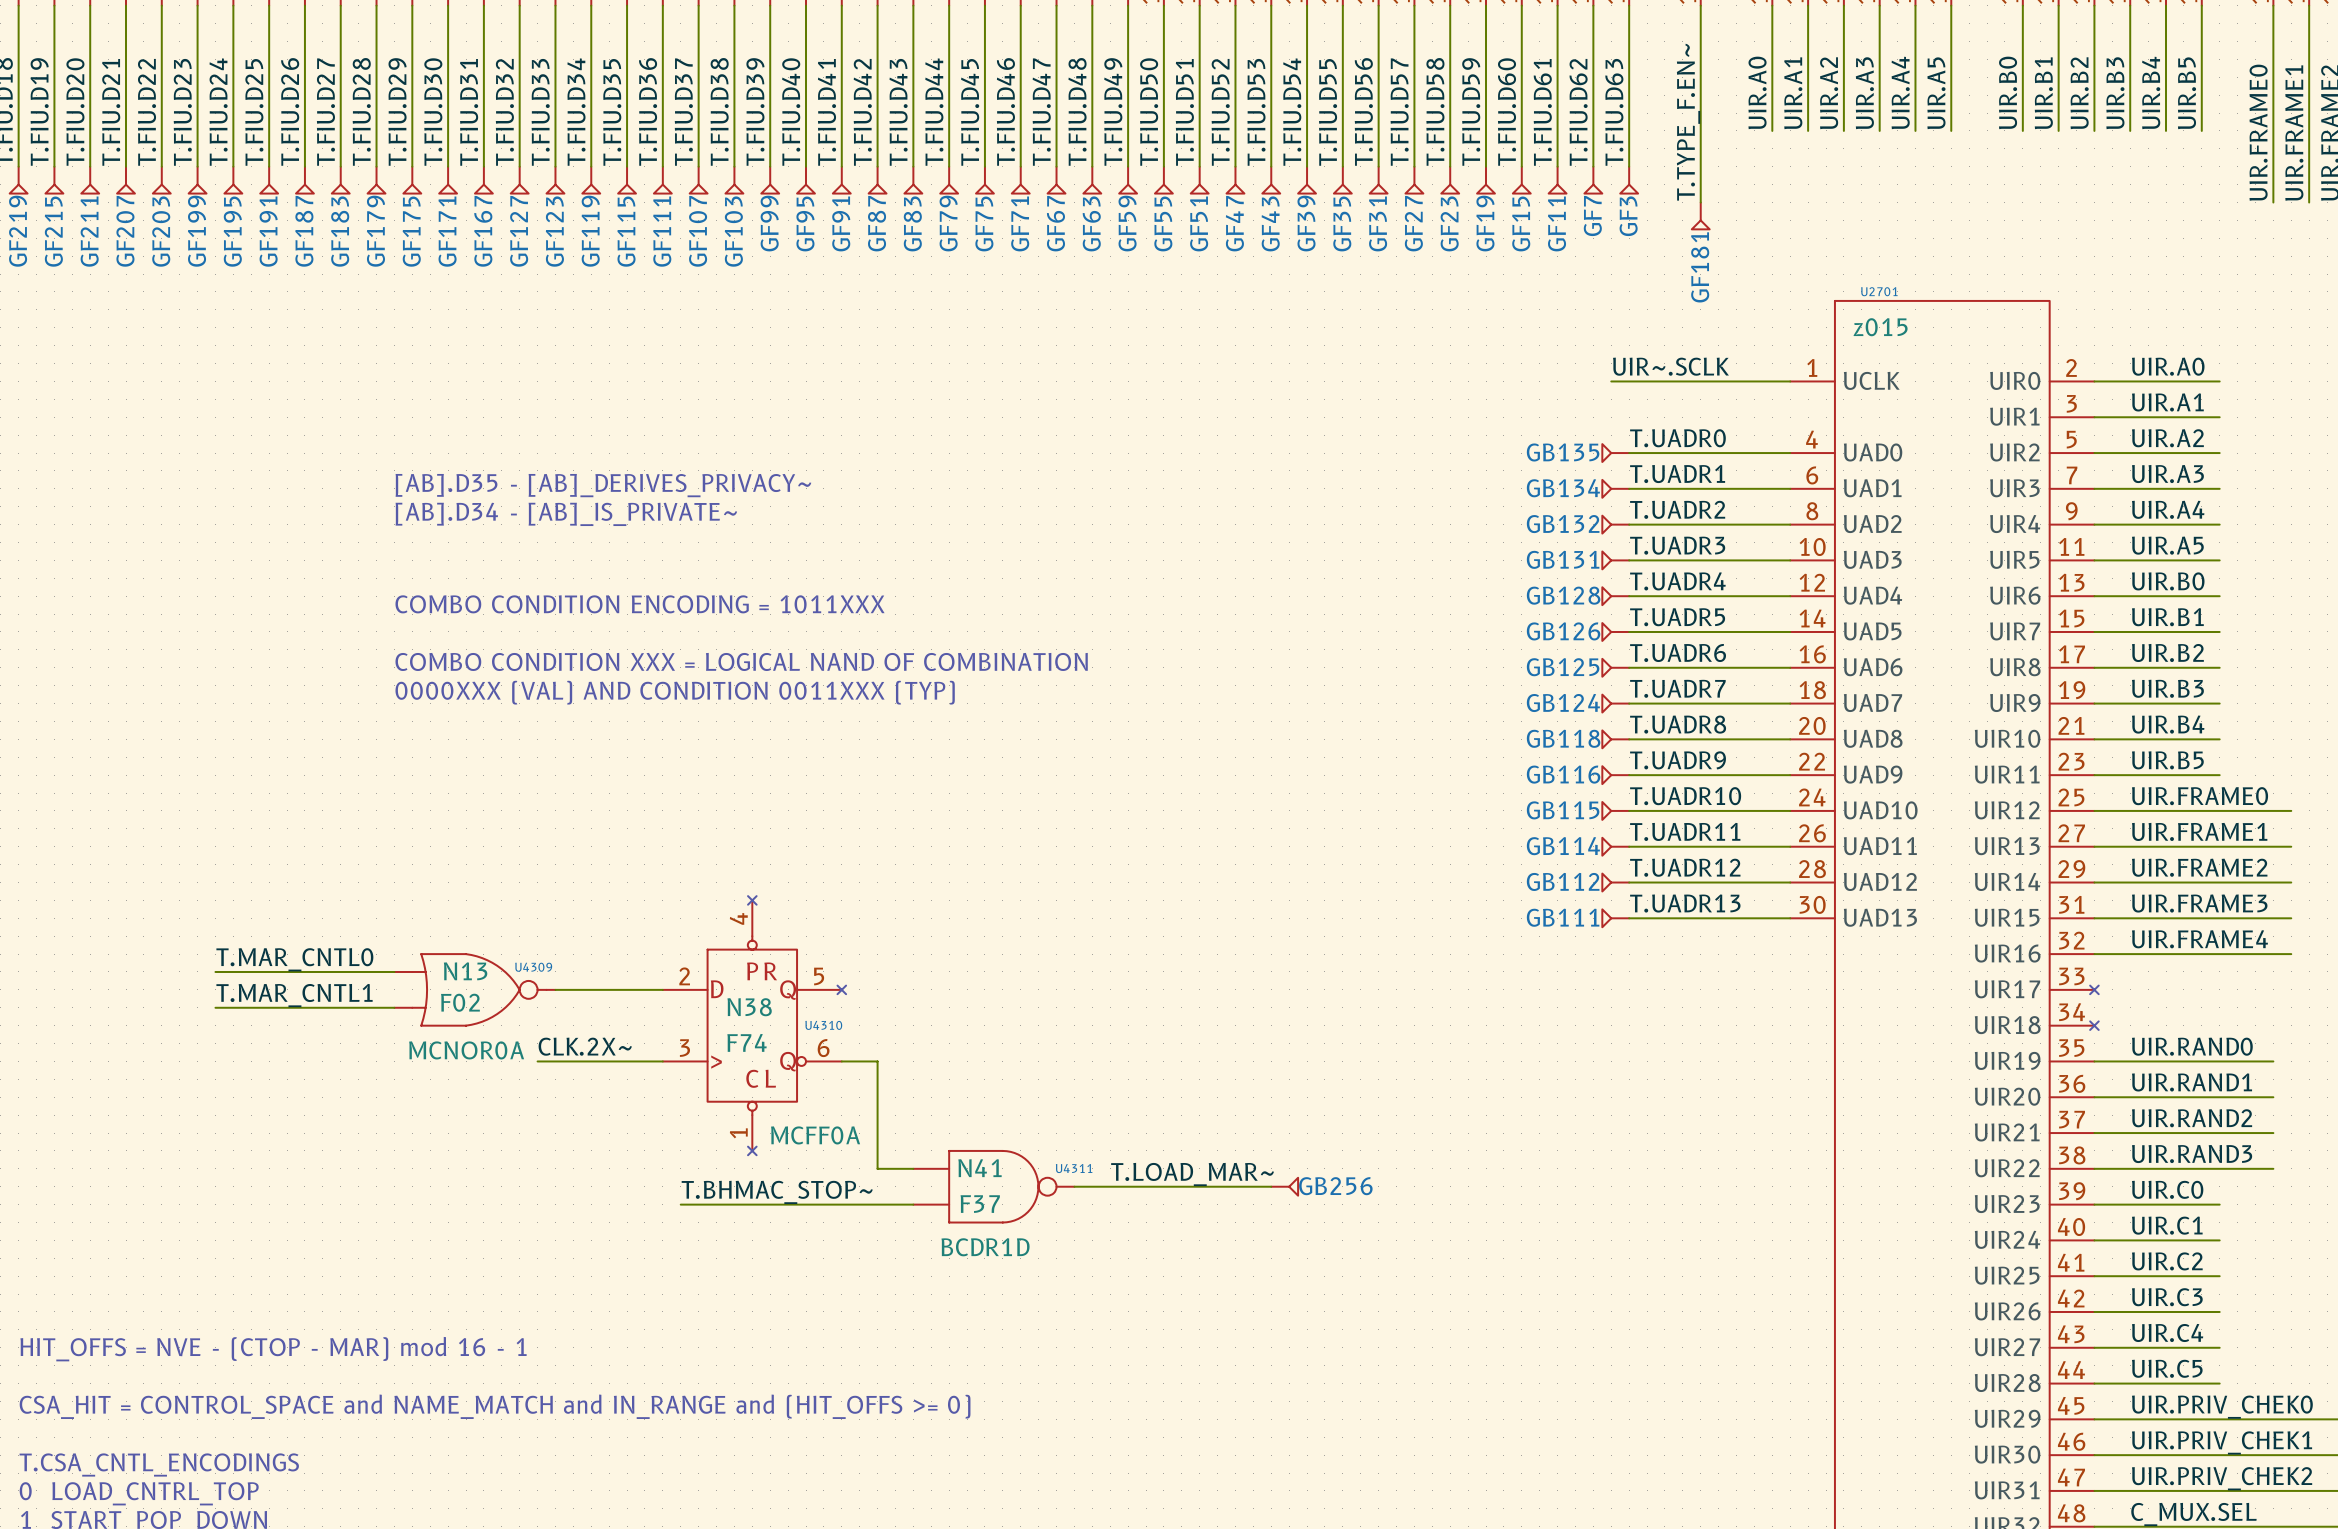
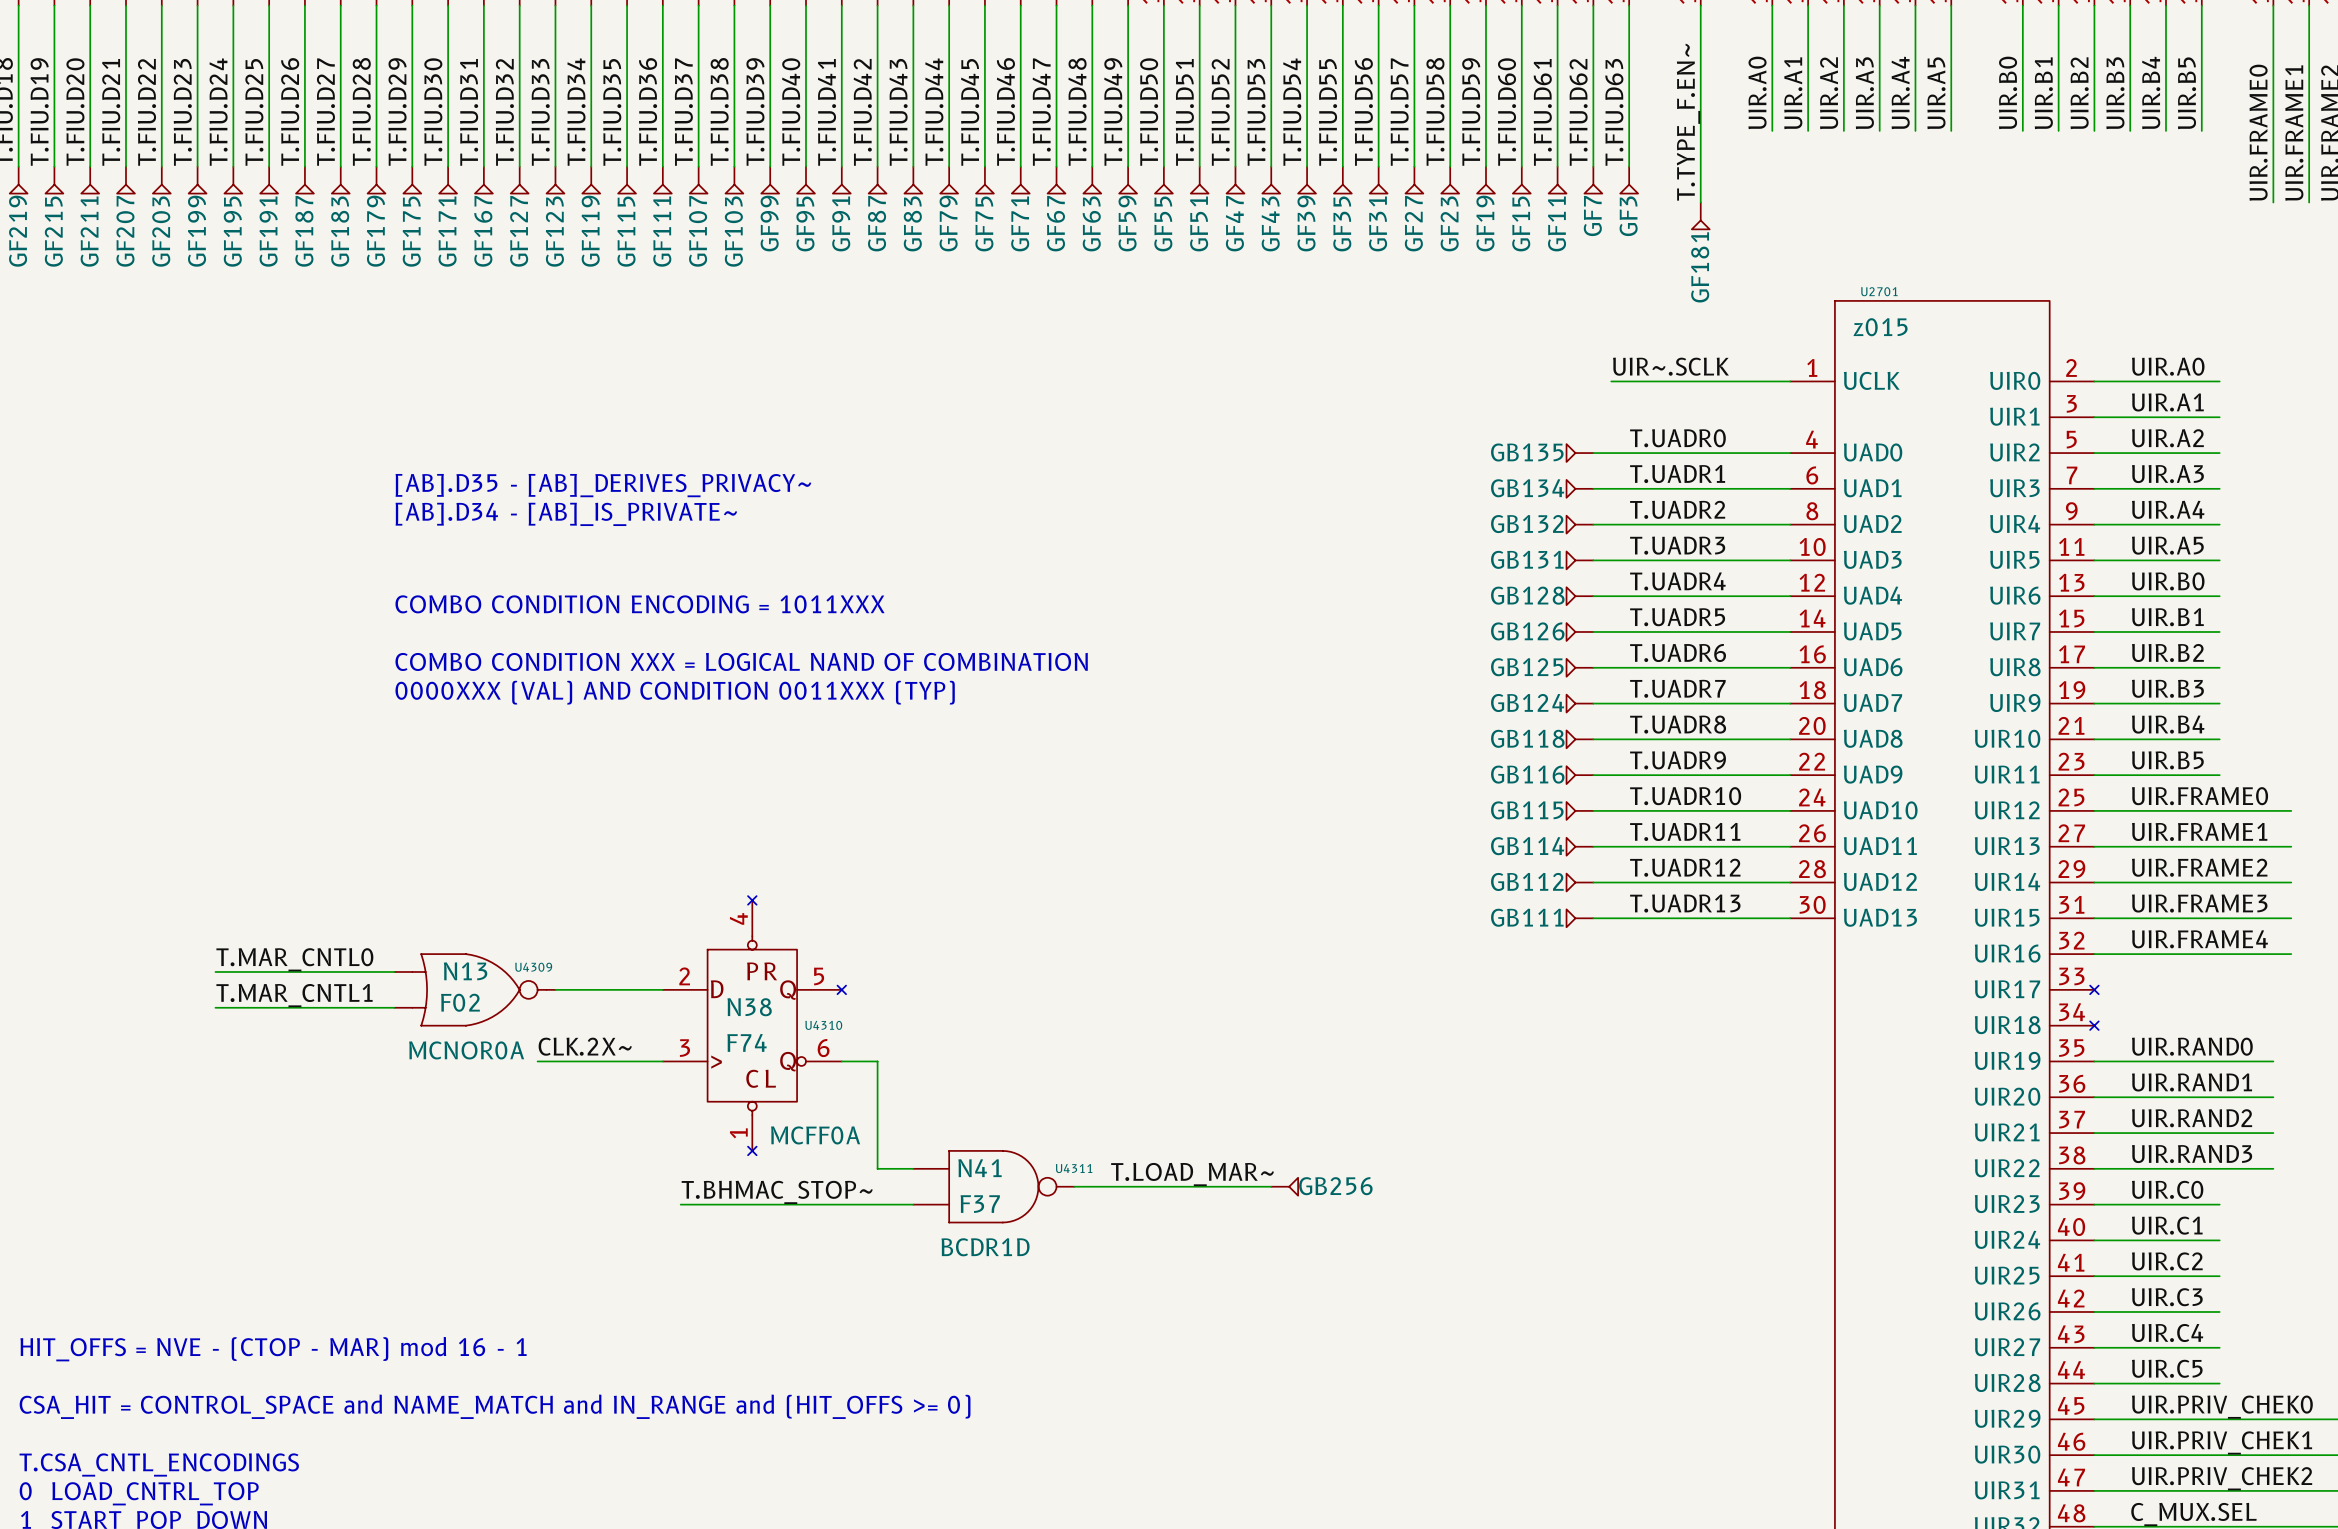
GB135 position: (1615, 453) -> (1579, 453)
GB134 position: (1615, 488) -> (1579, 488)
GB132 position: (1615, 524) -> (1579, 524)
GB131 position: (1615, 560) -> (1579, 560)
GB128 position: (1615, 596) -> (1579, 596)
GB126 position: (1615, 631) -> (1579, 631)
GB125 position: (1615, 667) -> (1579, 667)
GB124 position: (1615, 703) -> (1579, 703)
GB118 position: (1615, 739) -> (1579, 739)
GB116 position: (1615, 775) -> (1579, 775)
GB115 position: (1615, 810) -> (1579, 810)
GB114 position: (1615, 846) -> (1579, 846)
GB112 position: (1615, 882) -> (1579, 882)
GB111 position: (1615, 918) -> (1579, 918)

